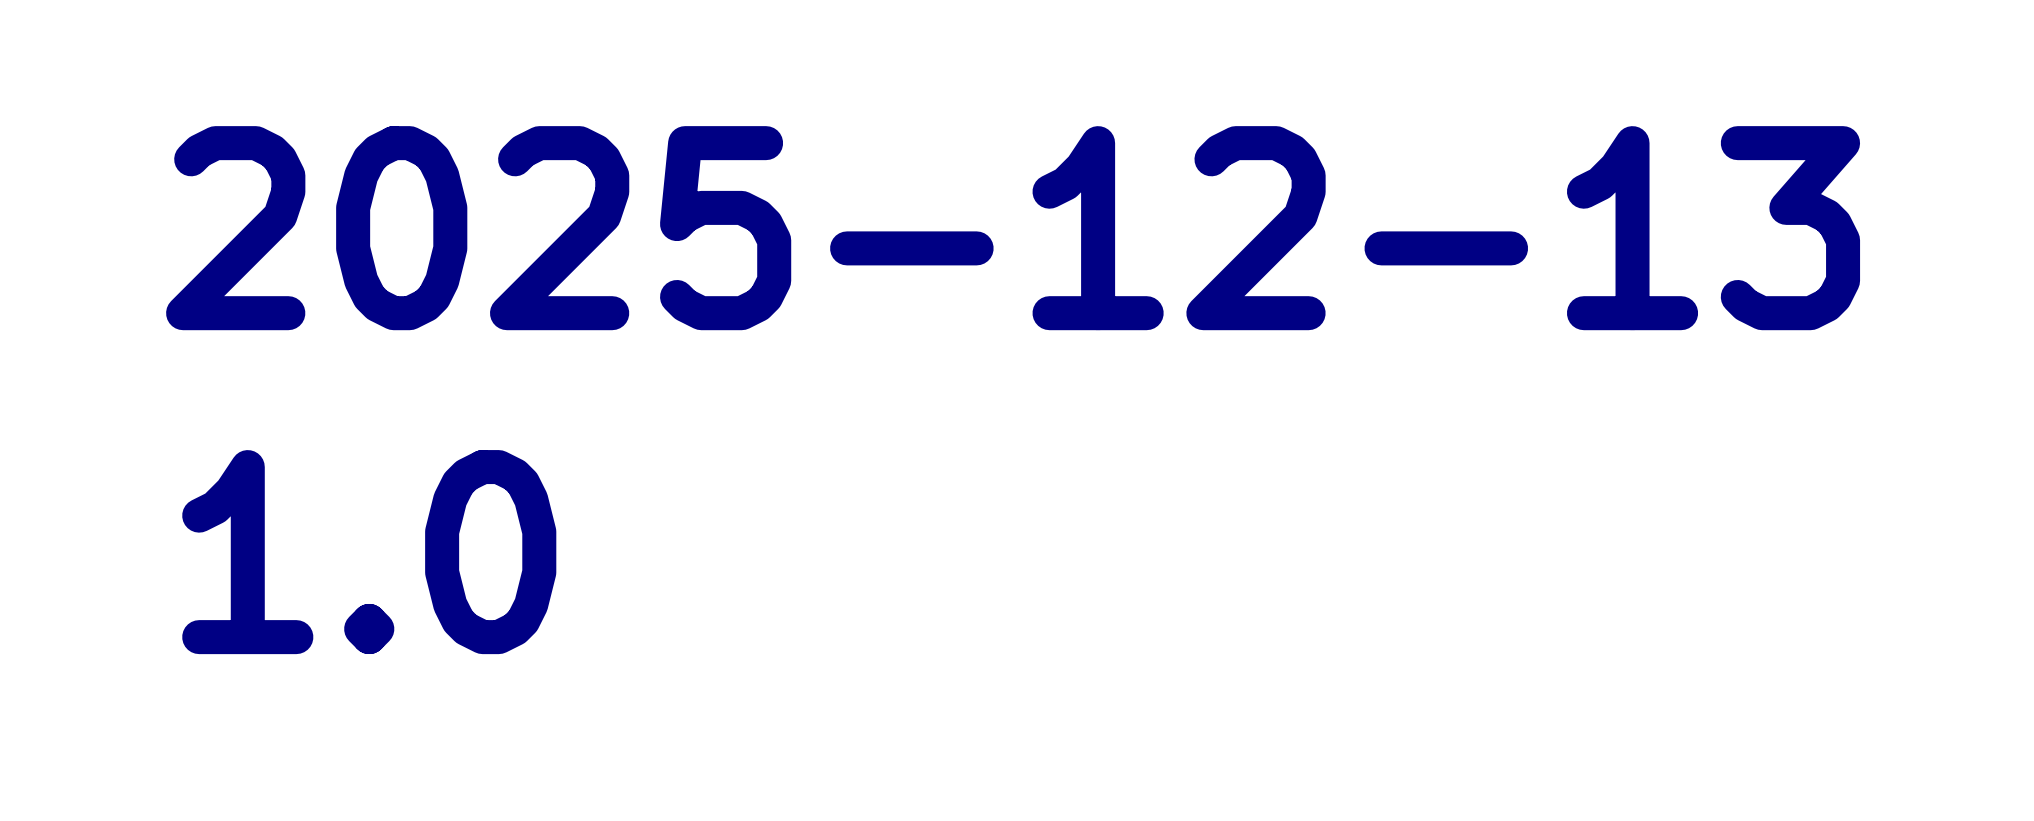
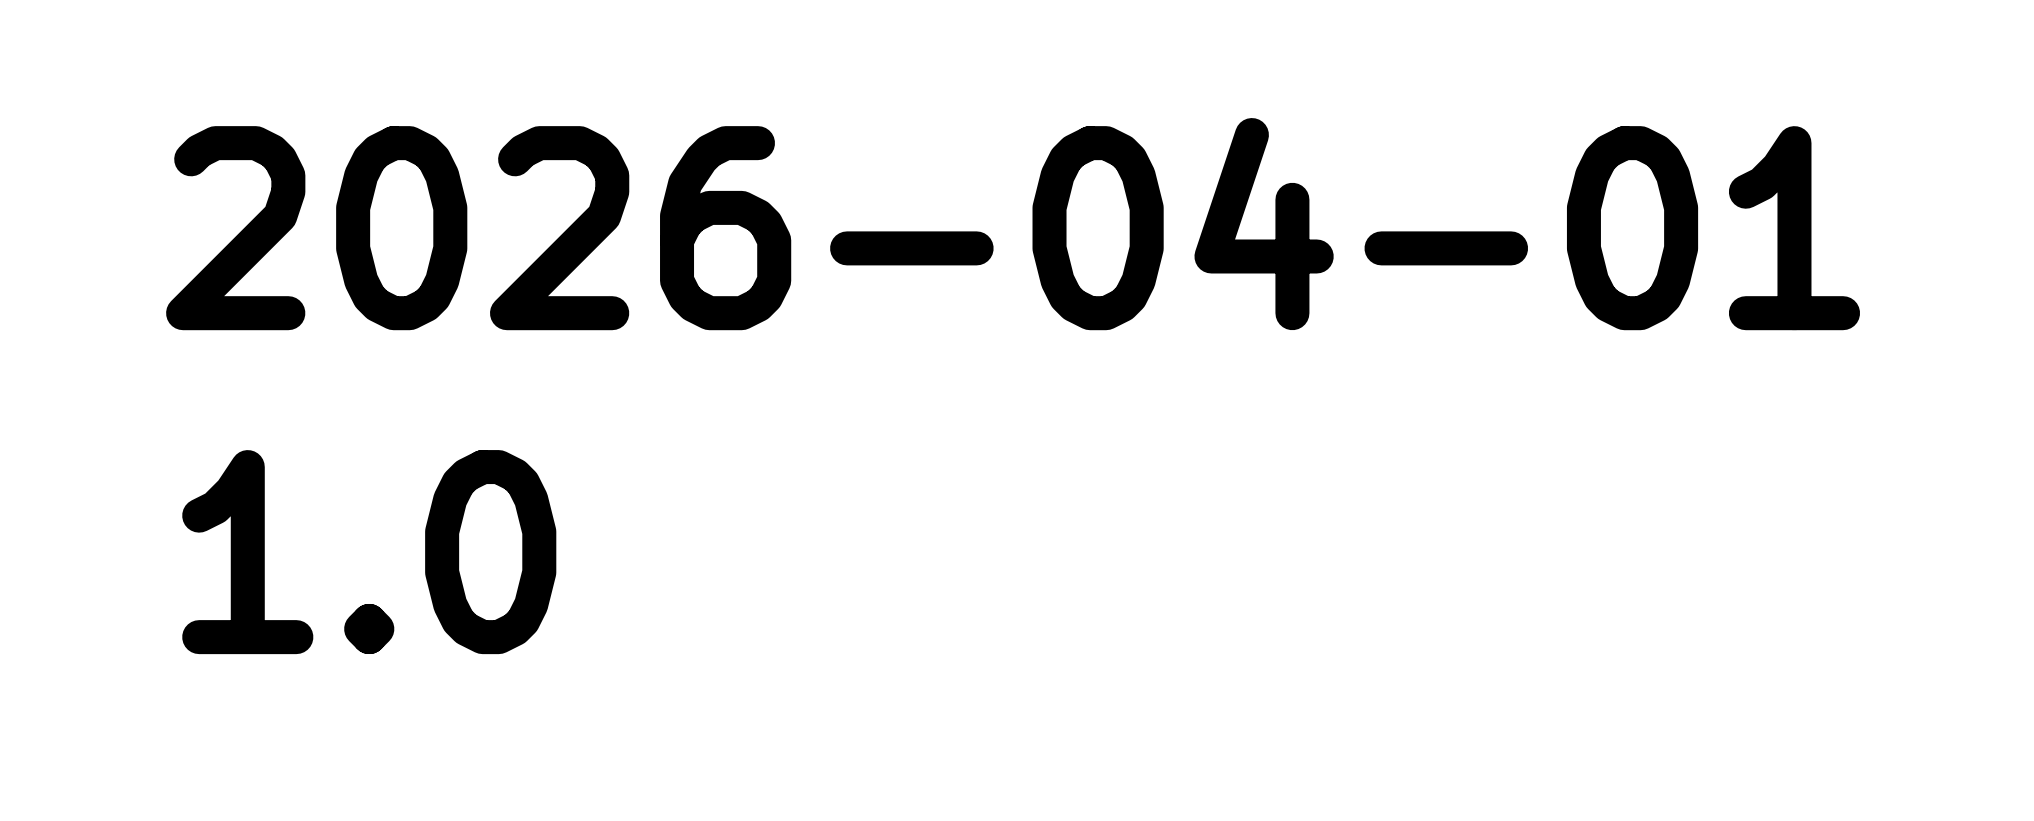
text: 2025-12-13 (1013, 228) -> 2026-04-01 (1013, 224)

